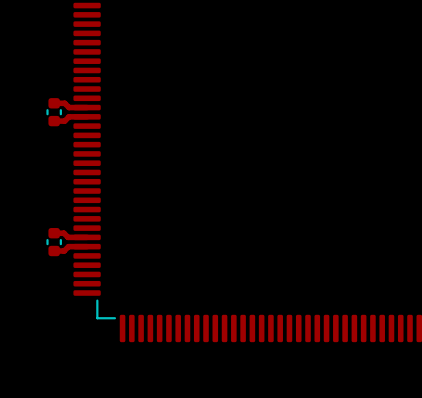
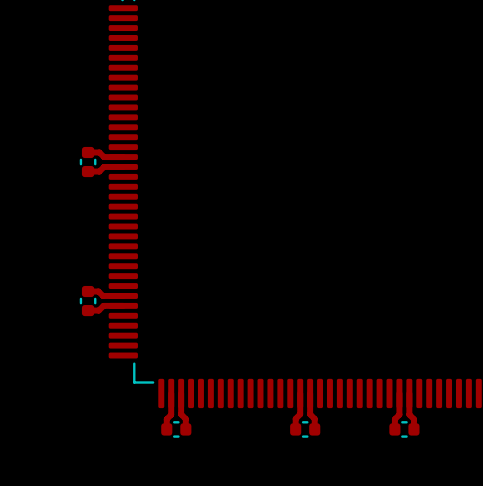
track: none -> (171, 393) (171, 414) (166, 419) (166, 429)
track: none -> (181, 393) (181, 414) (185, 419) (185, 429)
track: none -> (300, 393) (300, 414) (295, 418) (295, 429)
track: none -> (310, 393) (310, 414) (314, 418) (314, 429)
track: none -> (399, 393) (399, 414) (394, 419) (394, 429)
track: none -> (409, 393) (409, 414) (413, 419) (413, 429)
part: none -> (176, 429)
part: none -> (305, 429)
part: none -> (404, 429)

